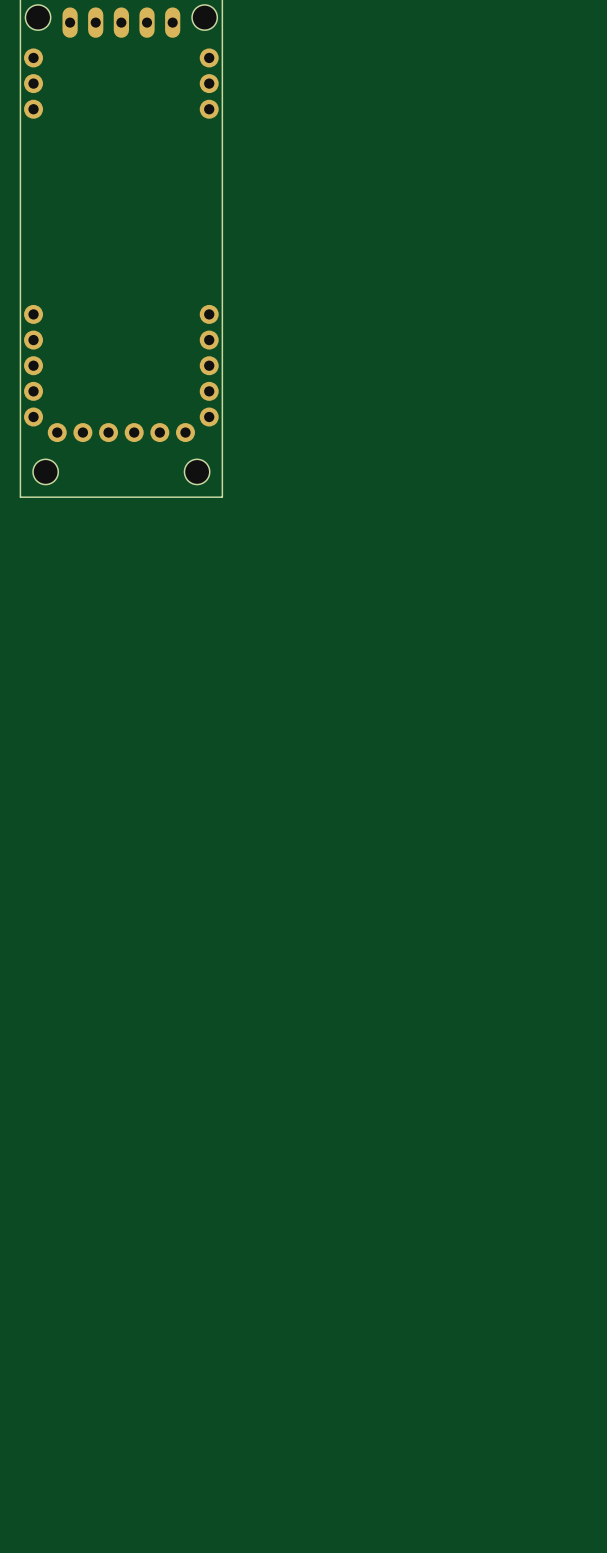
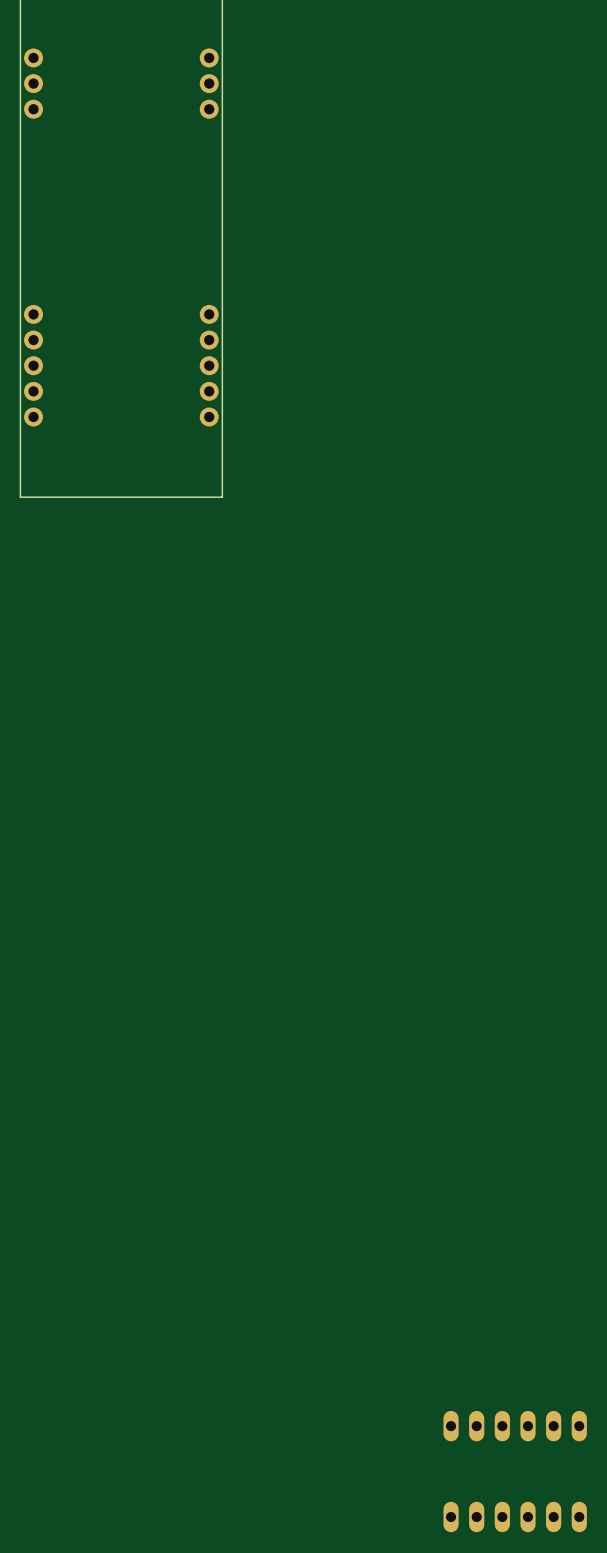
hole: (38, 17) -> none
hole: (204, 17) -> none
part: (121, 22) -> none
part: (121, 432) -> none
hole: (45, 471) -> none
hole: (197, 471) -> none
part: none -> (515, 1426)
part: none -> (515, 1517)

